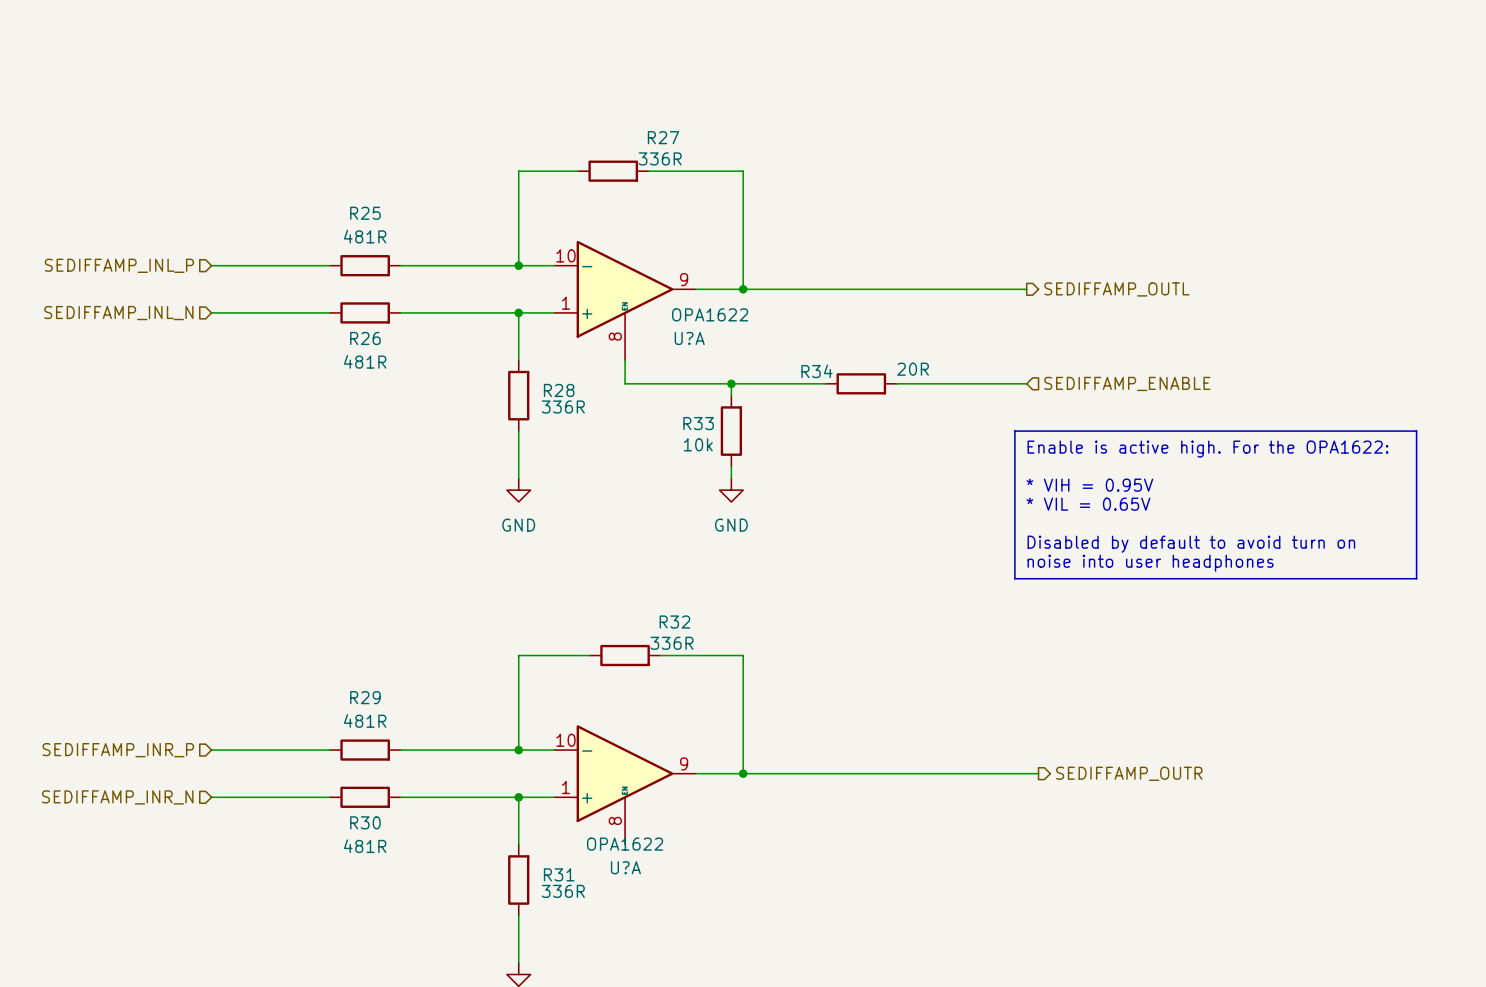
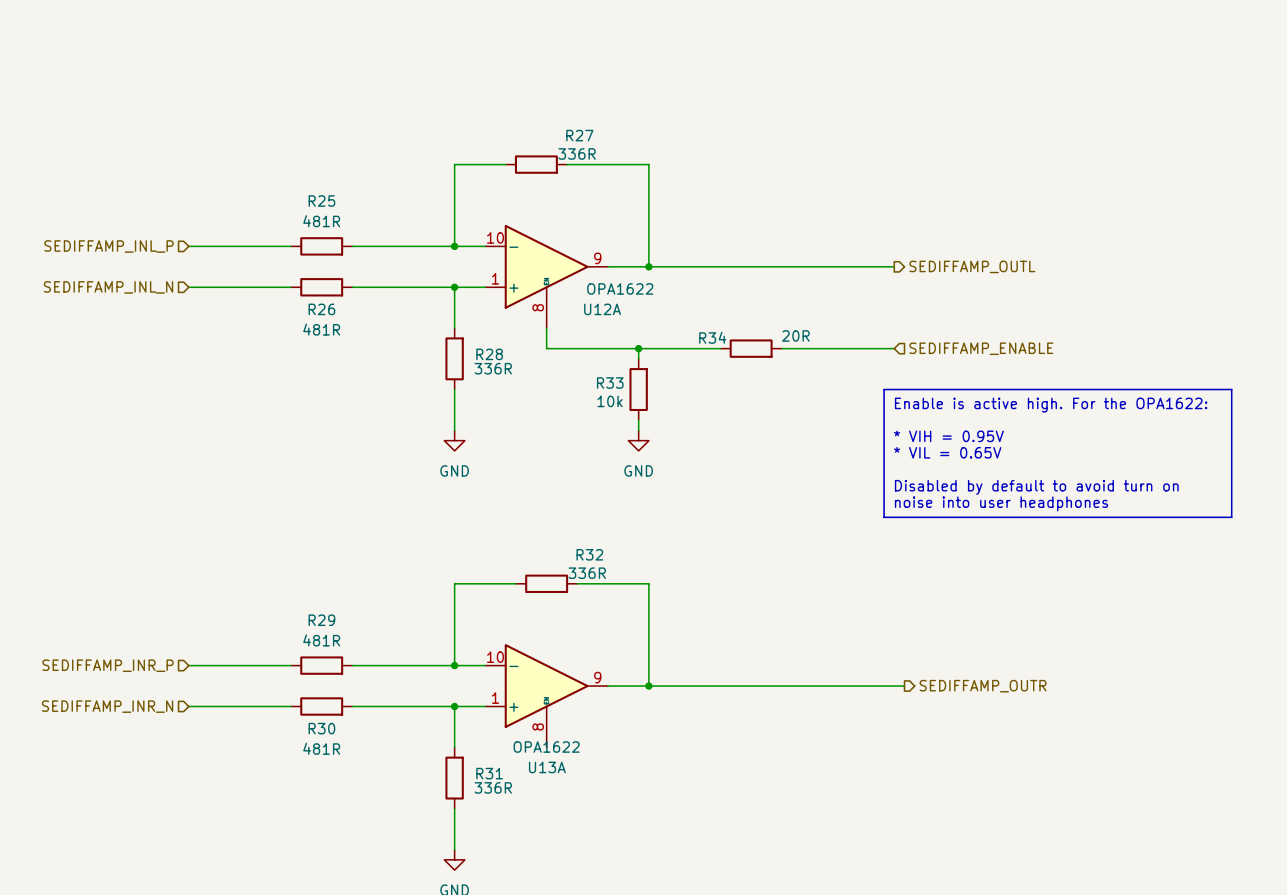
U?A name: U?A (689, 338) -> U12A (602, 309)
U?A name: U?A (625, 867) -> U13A (547, 767)

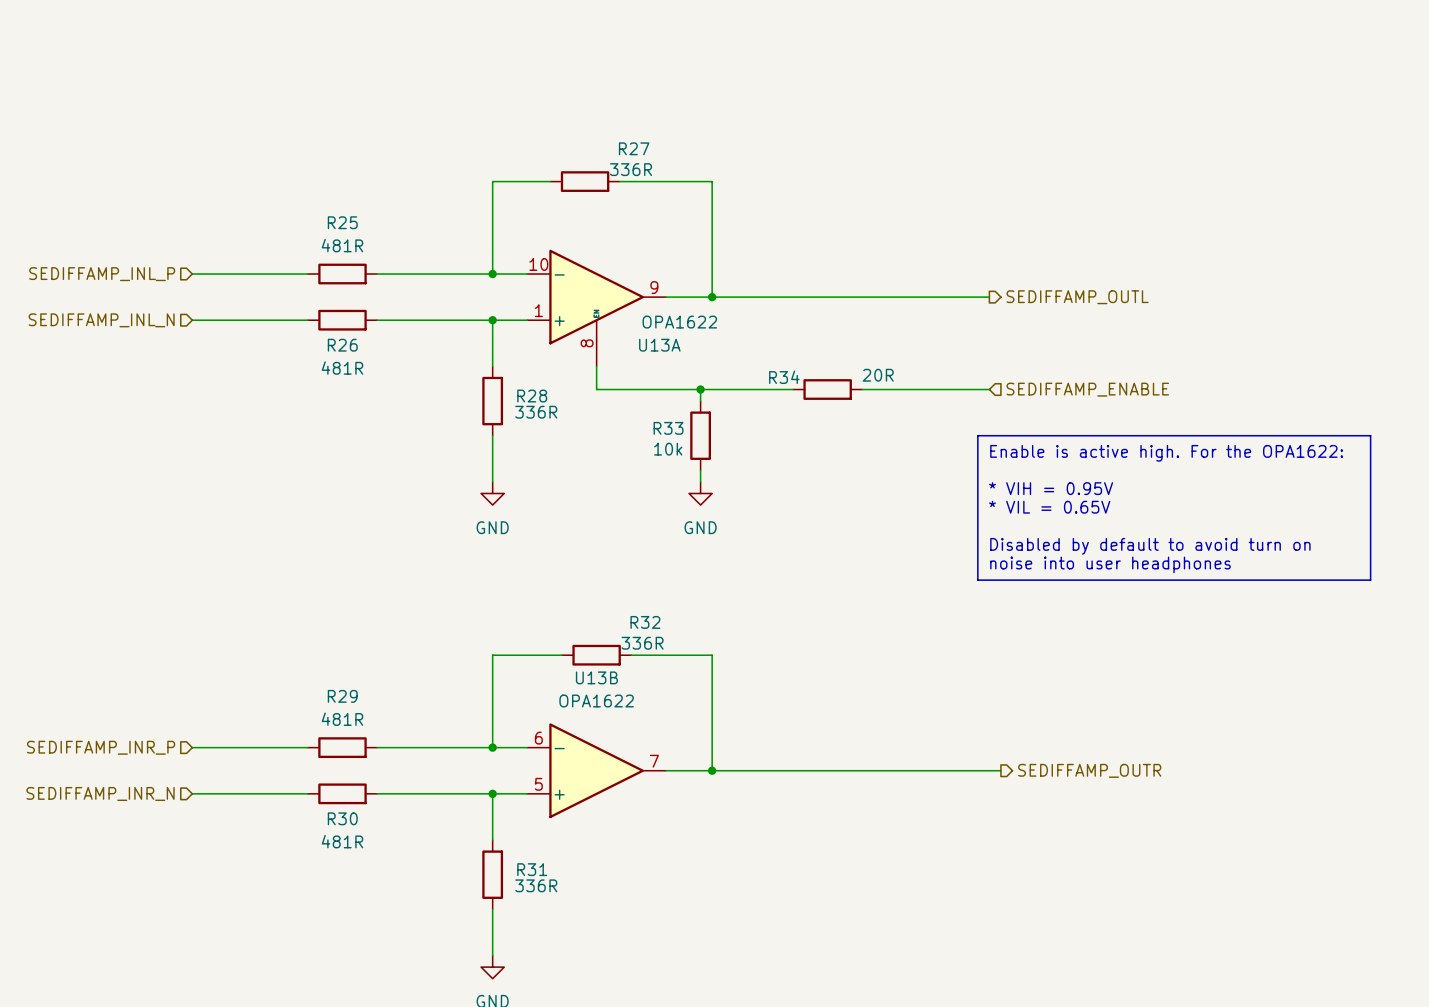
U12A name: U12A (602, 309) -> U13A (659, 345)
U13B: none -> OPA1622 (596, 770)
U13A: OPA1622 (546, 695) -> none

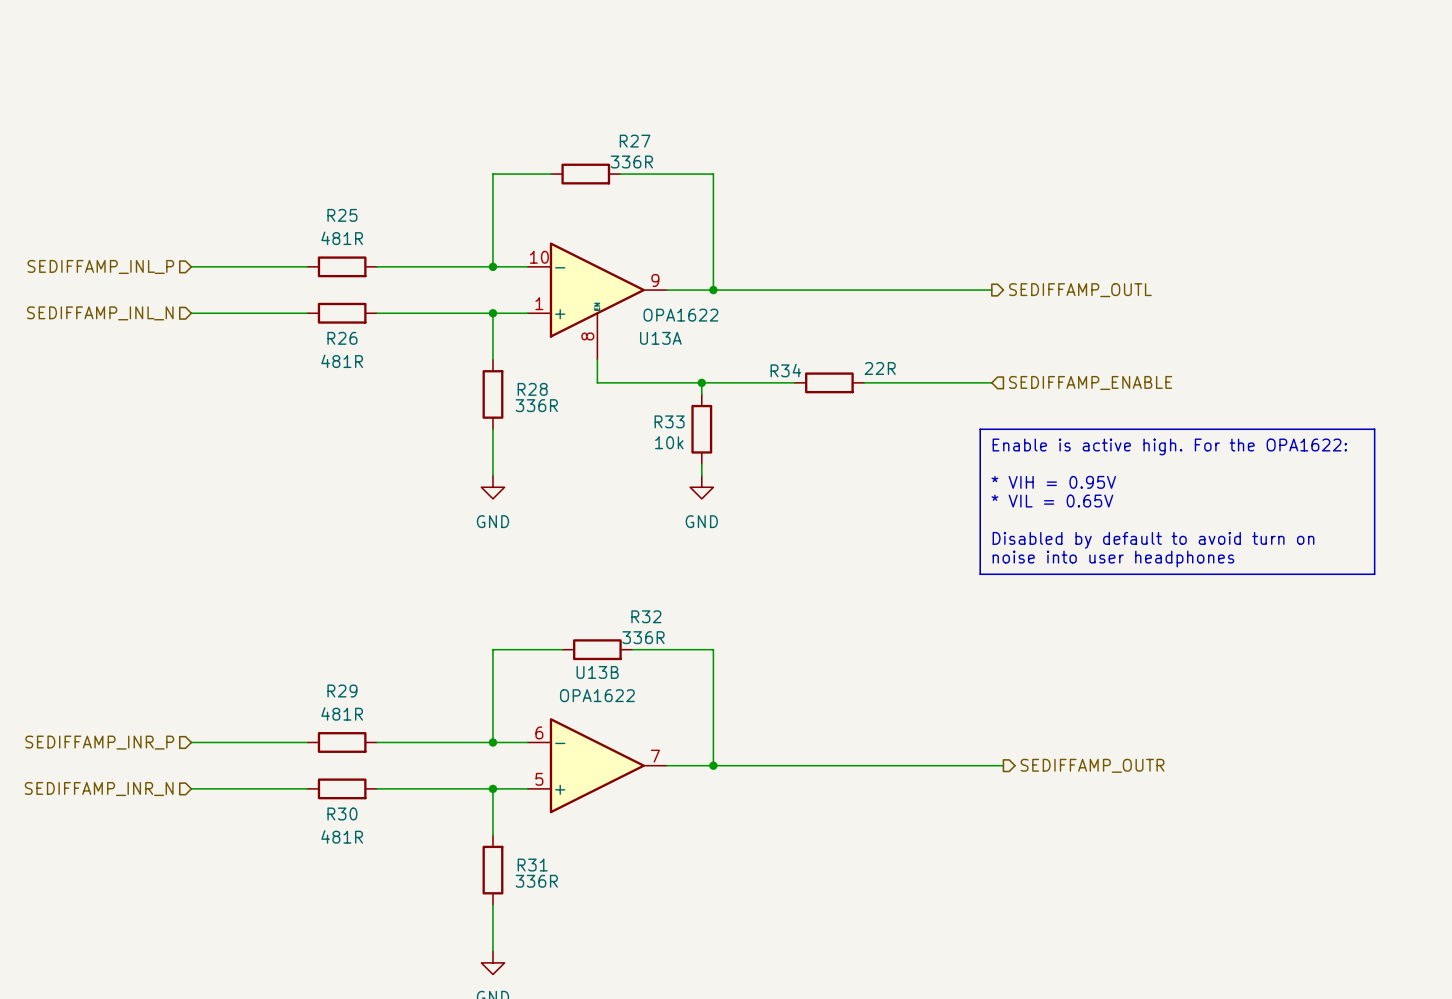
R34 value: 20R (878, 375) -> 22R (880, 368)

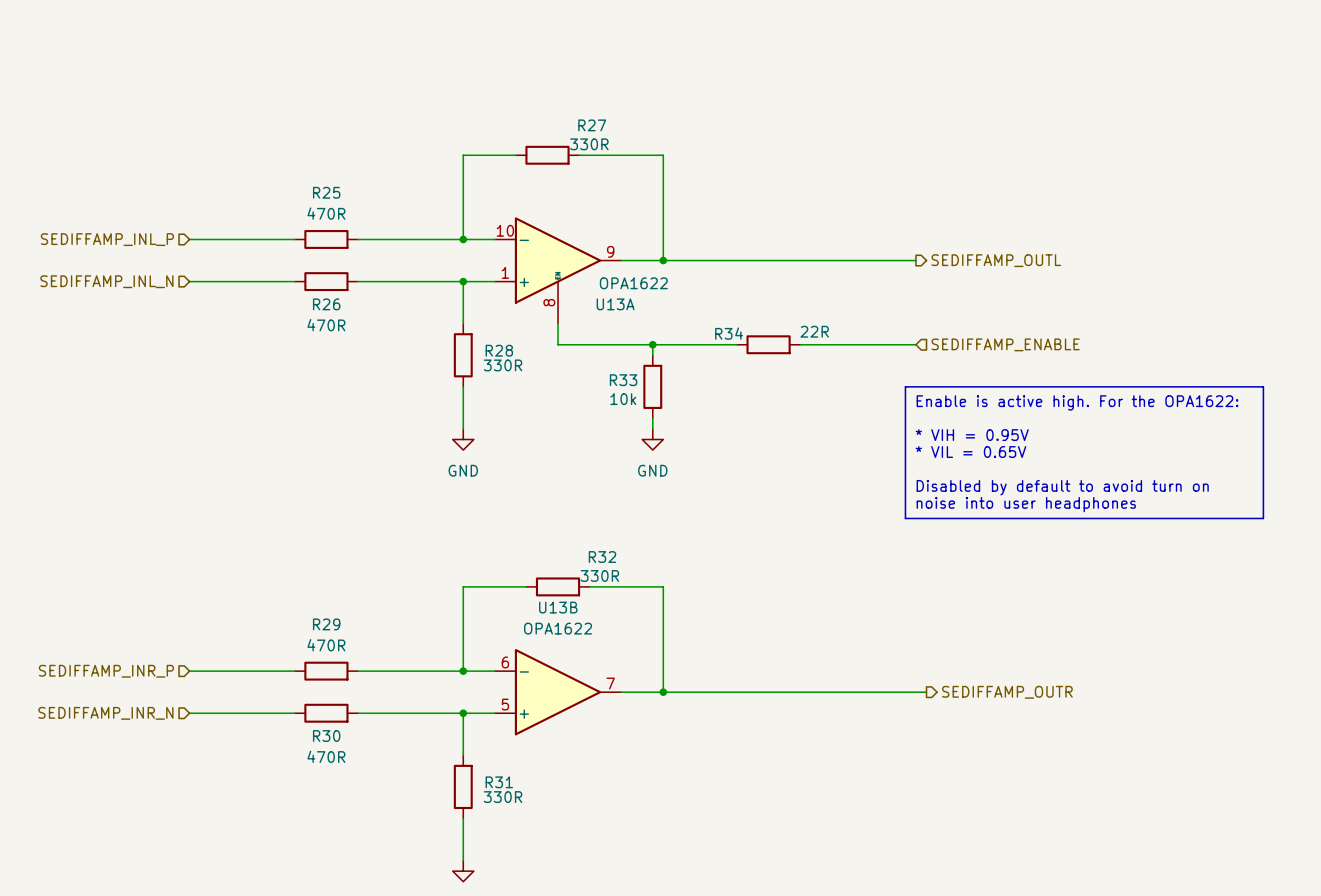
R27 value: 336R (631, 162) -> 330R (589, 144)
R25 value: 481R (342, 238) -> 470R (326, 213)
R26 value: 481R (342, 361) -> 470R (326, 325)
R28 value: 336R (536, 405) -> 330R (503, 365)
R32 value: 336R (643, 637) -> 330R (599, 575)
R29 value: 481R (342, 713) -> 470R (326, 645)
R30 value: 481R (342, 836) -> 470R (326, 756)
R31 value: 336R (536, 881) -> 330R (503, 797)

